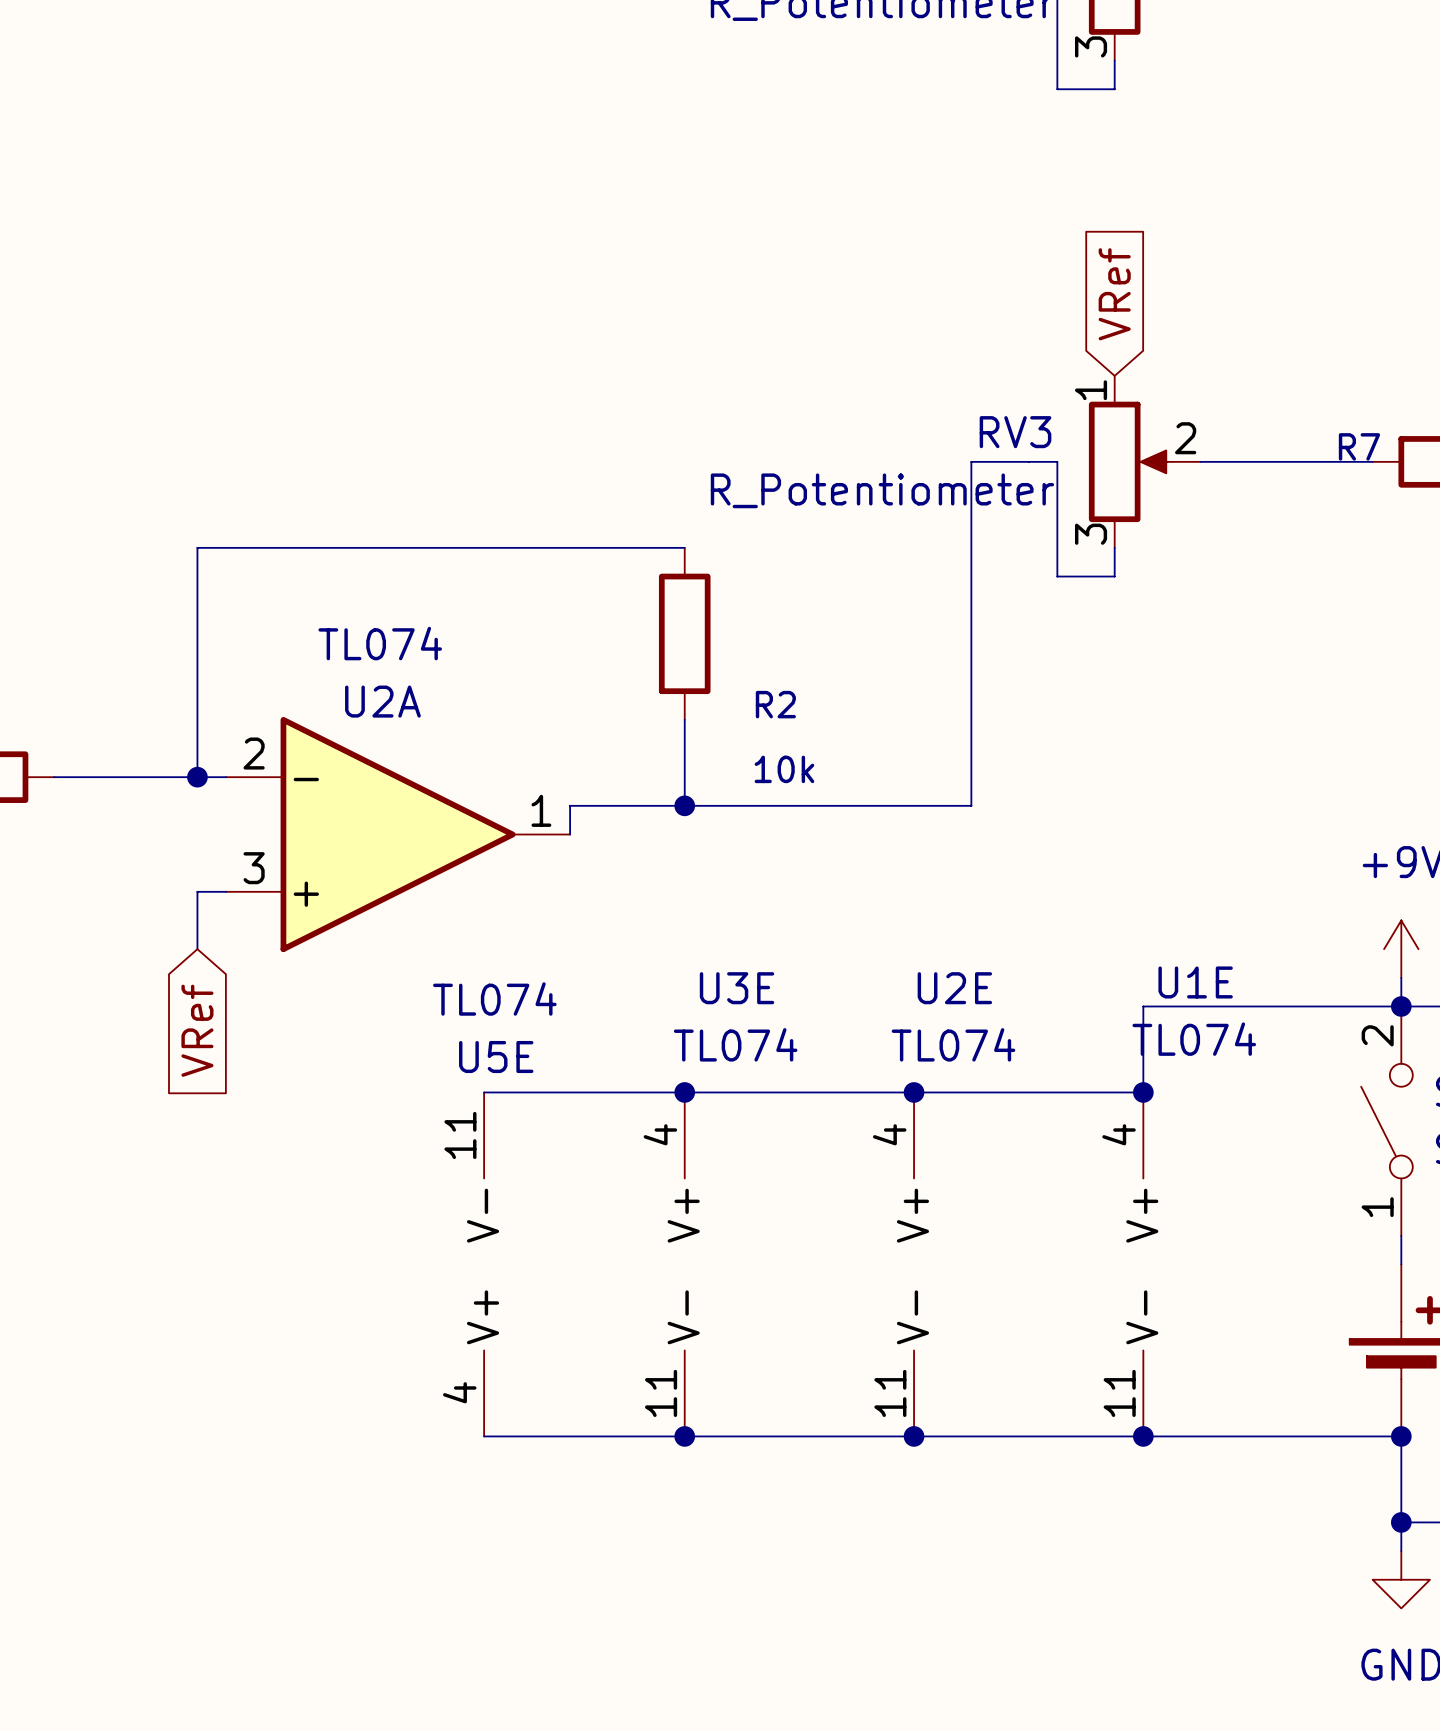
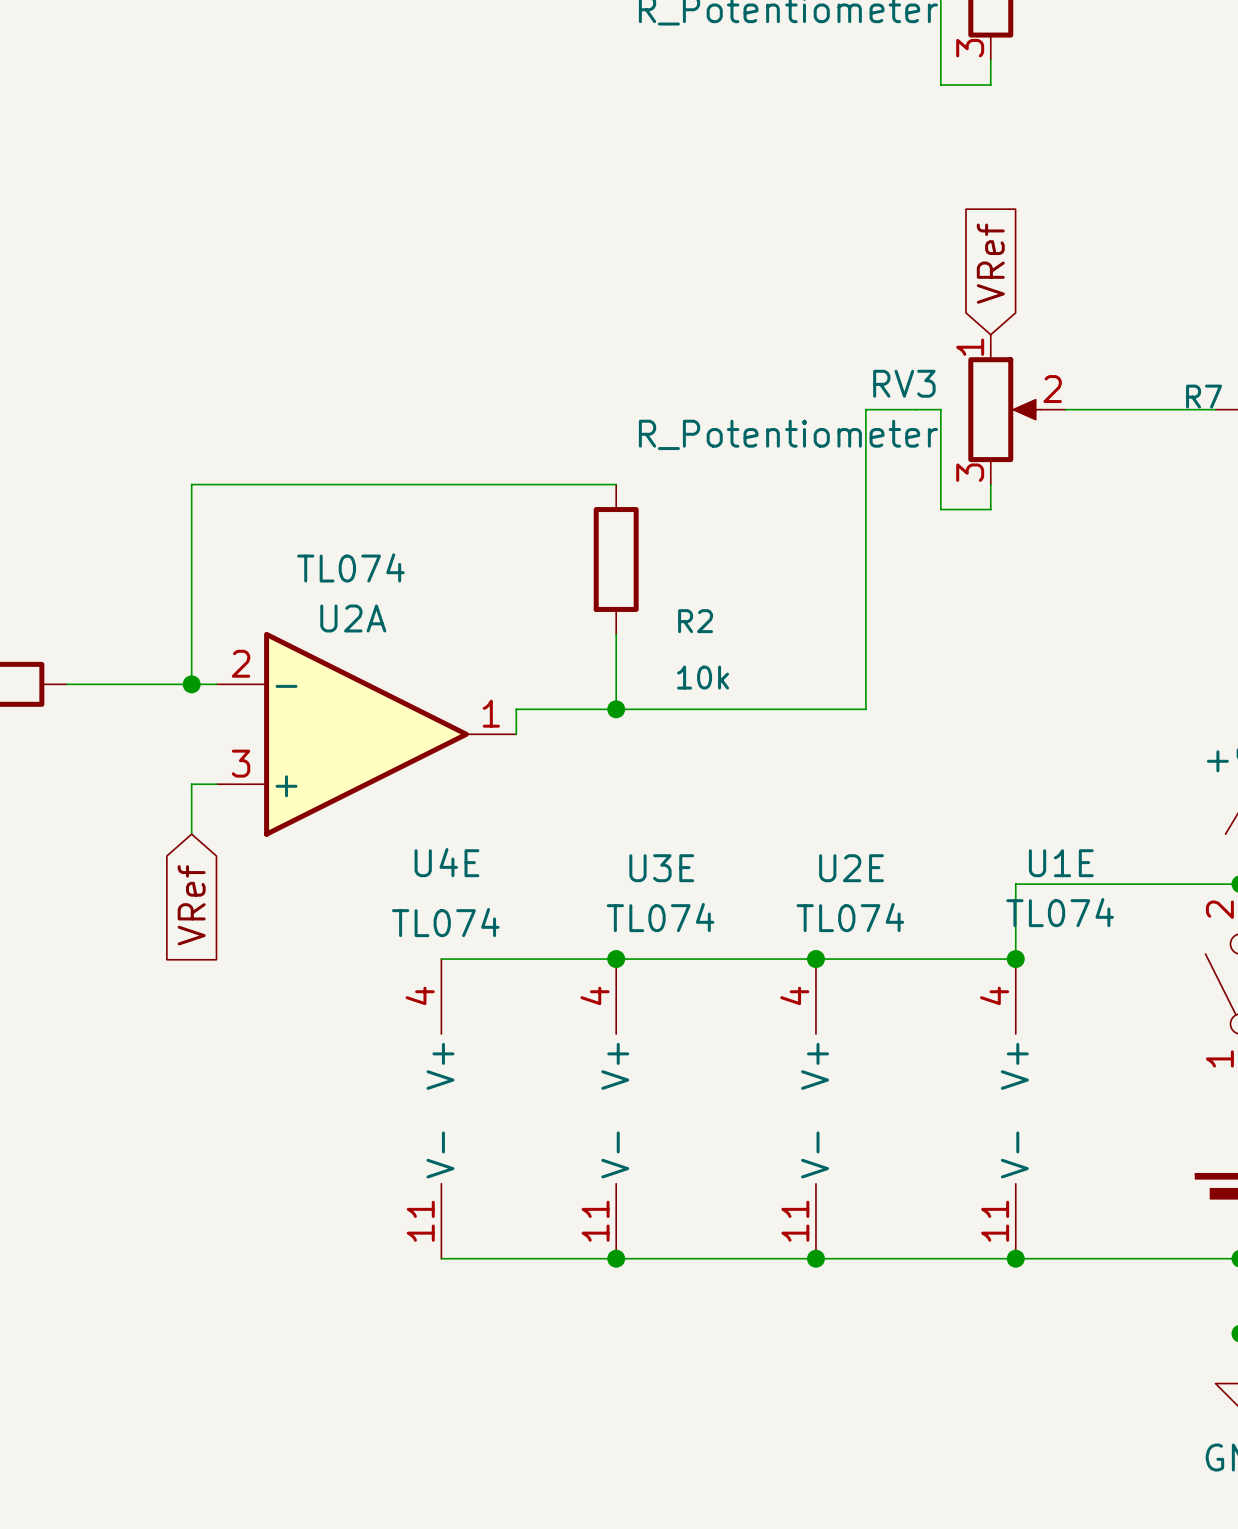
U5E value position: TL074 (494, 998) -> TL074 (445, 922)
U5E name: U5E (496, 1057) -> U4E (446, 862)
U5E rotation: 0° (484, 1264) -> 180° (441, 1108)

